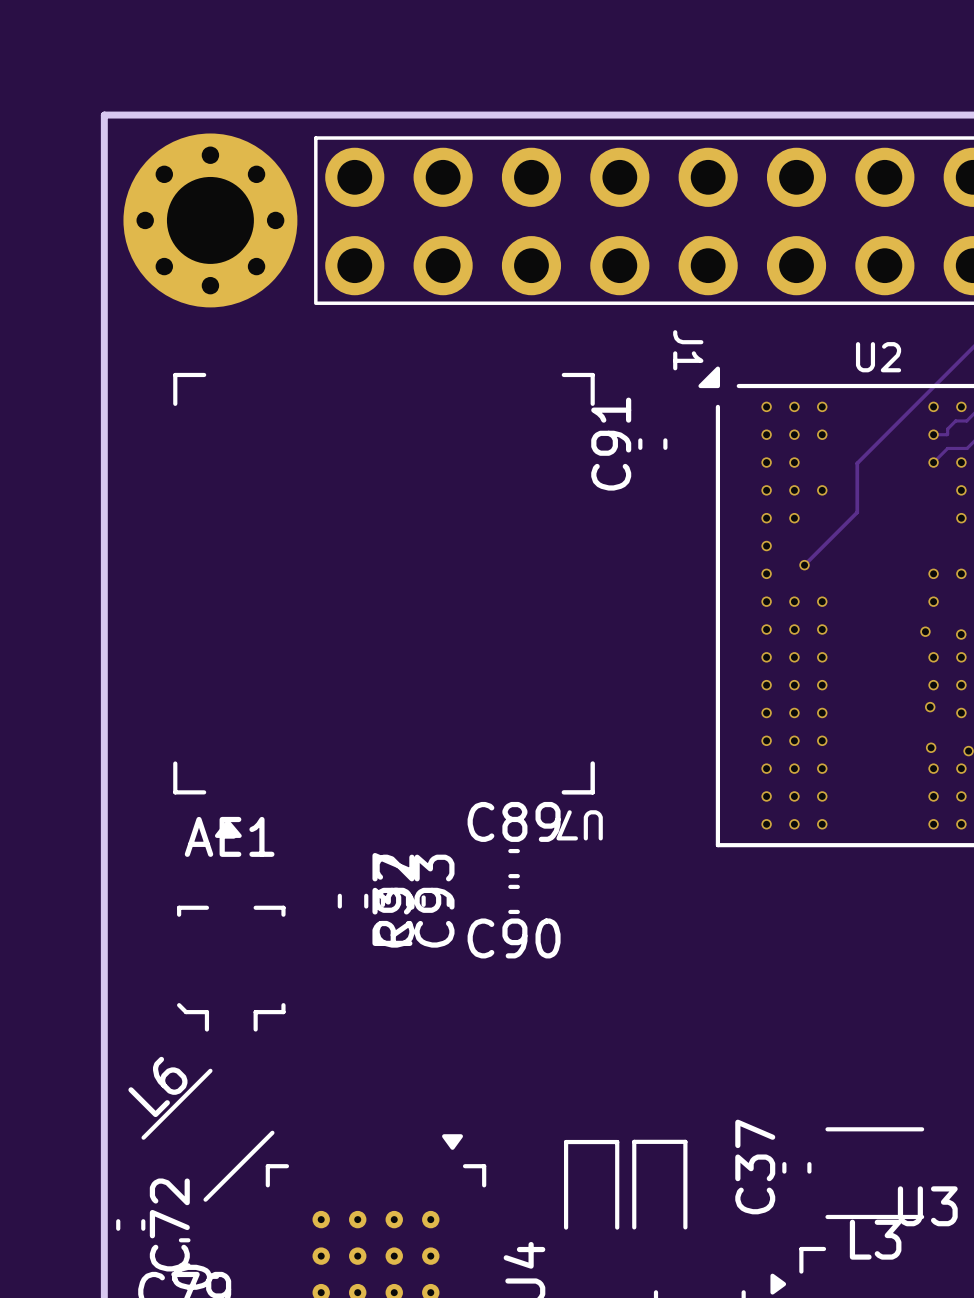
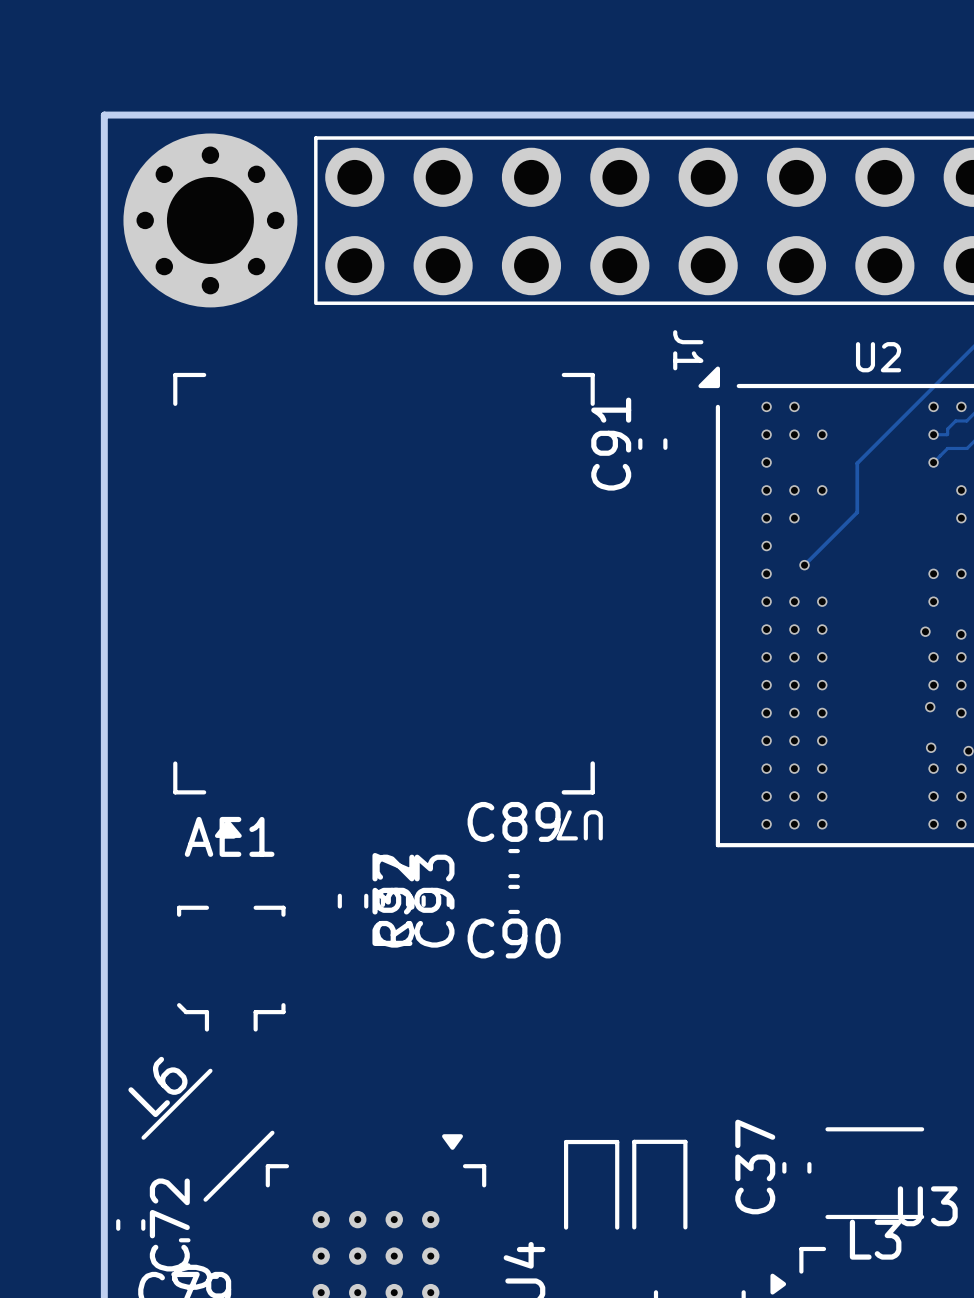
via: (822, 406) -> none
via: (794, 462) -> none
via: (961, 462) -> none

